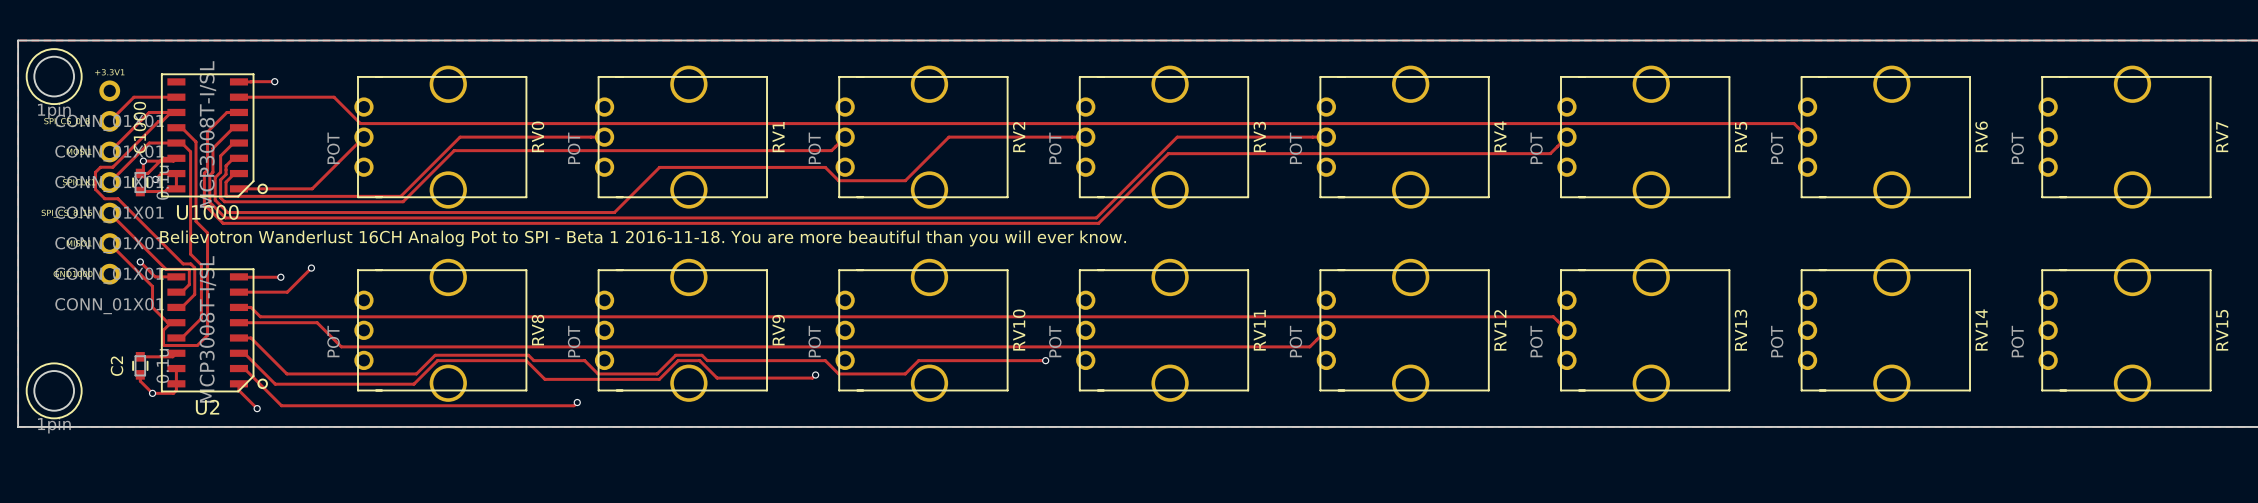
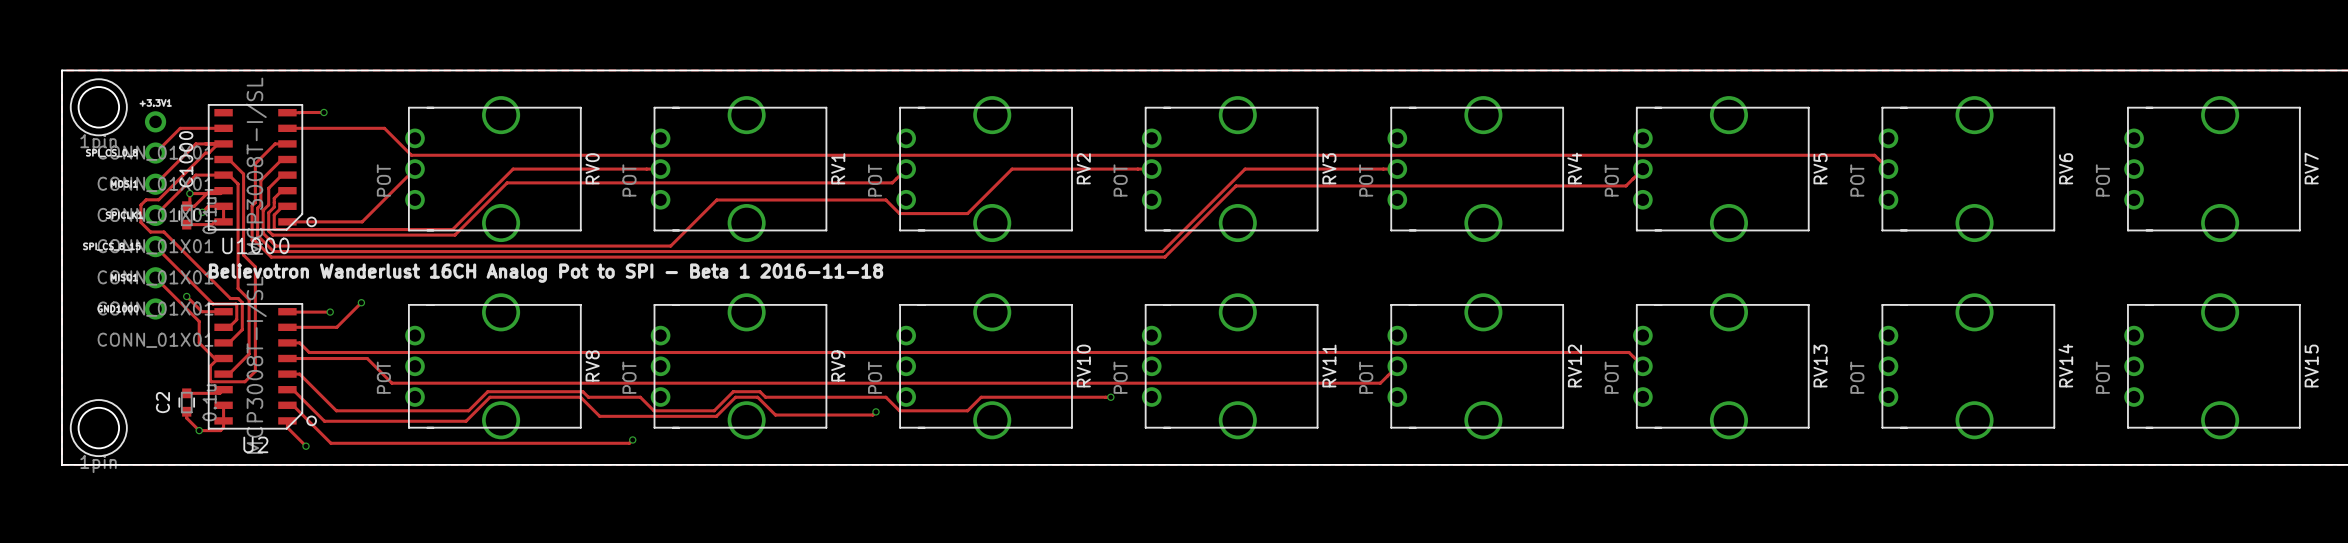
text: Believotron Wanderlust 16CH Analog Pot to SPI - Beta 1 2016-11-18. You are more beautiful than you will ever know. (643, 238) -> Believotron Wanderlust 16CH Analog Pot to SPI - Beta 1 2016-11-18 (546, 273)

